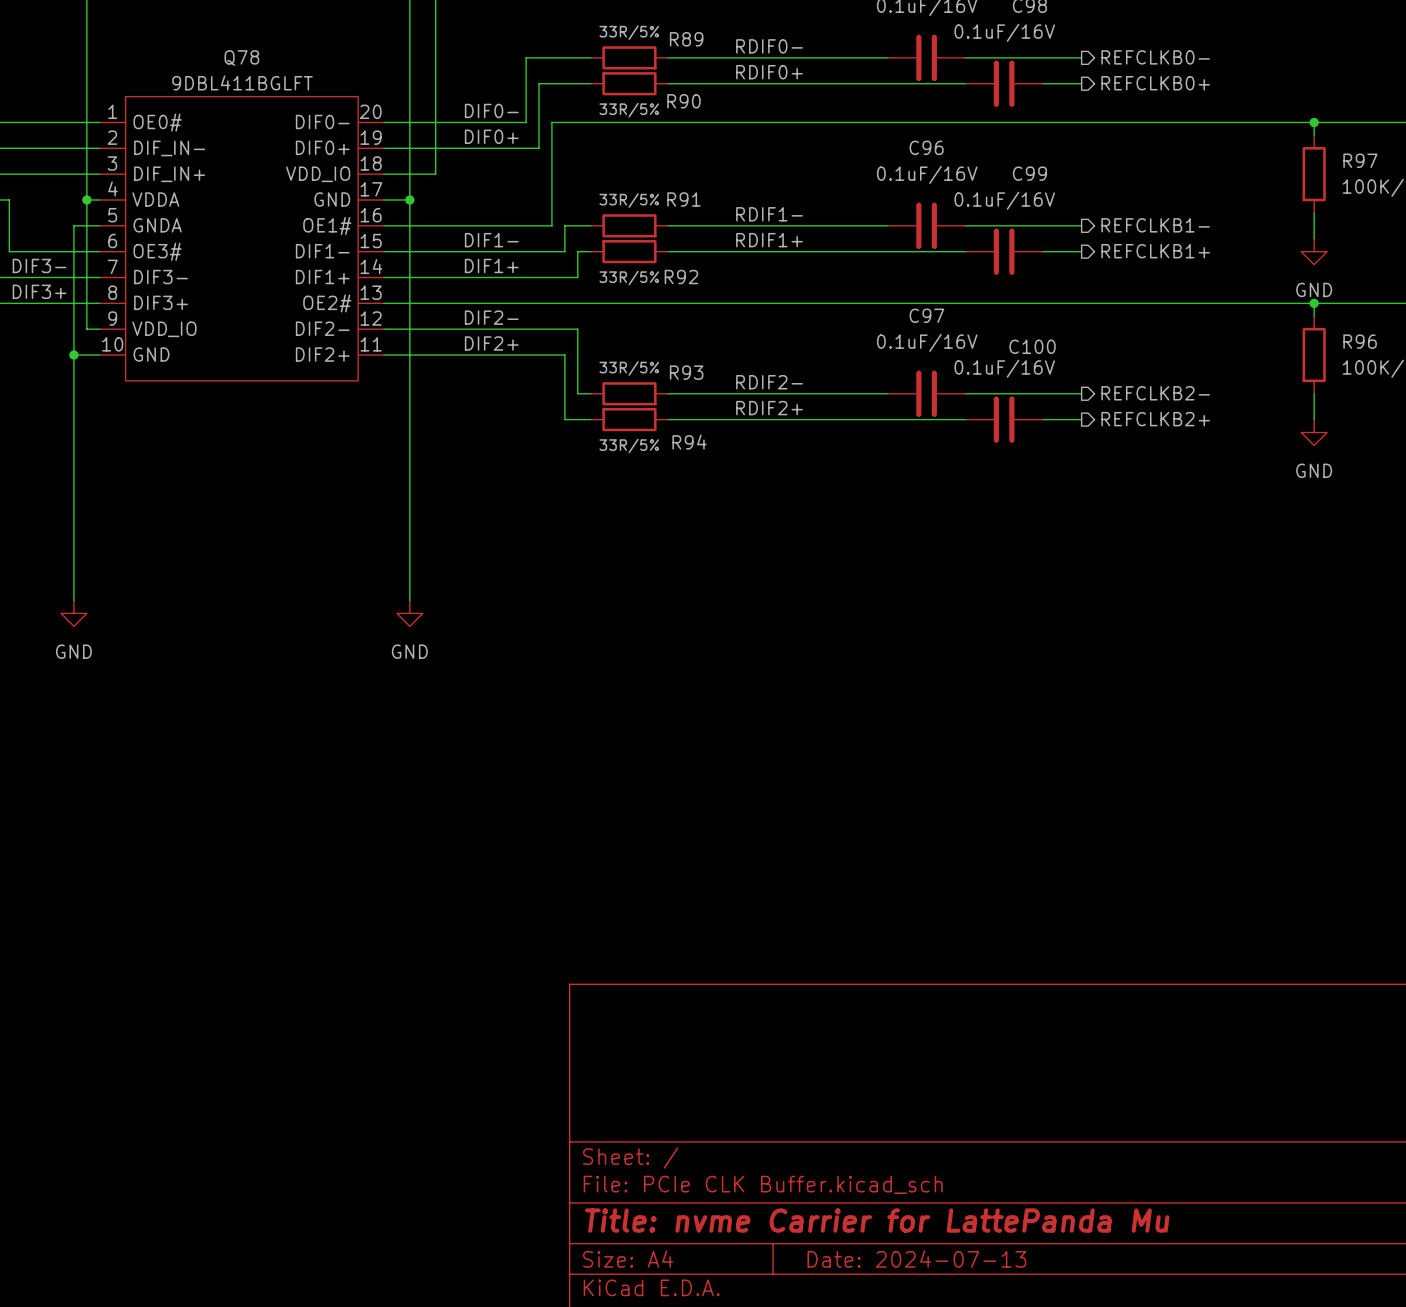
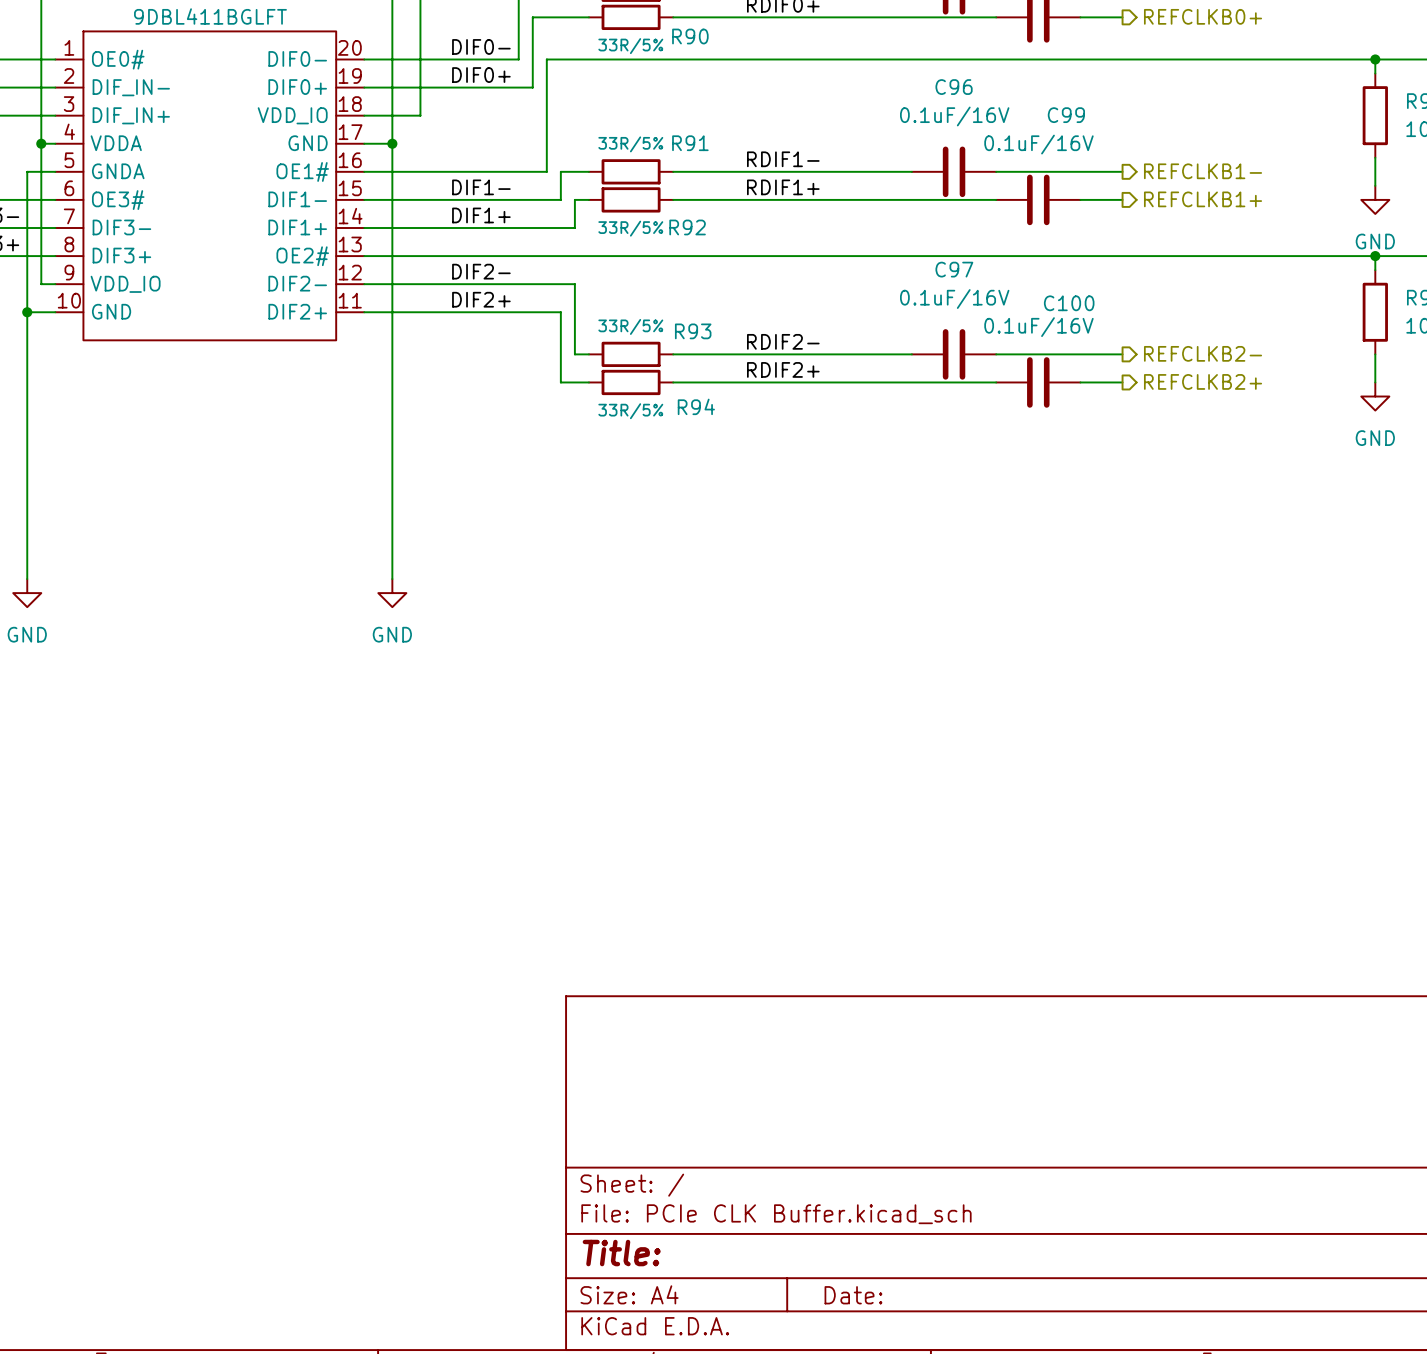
title block: Title: nvme Carrier for LattePanda Mu (877, 1220) -> Title: (621, 1253)
title block: Date: 2024-07-13 (916, 1259) -> Date: (853, 1295)

